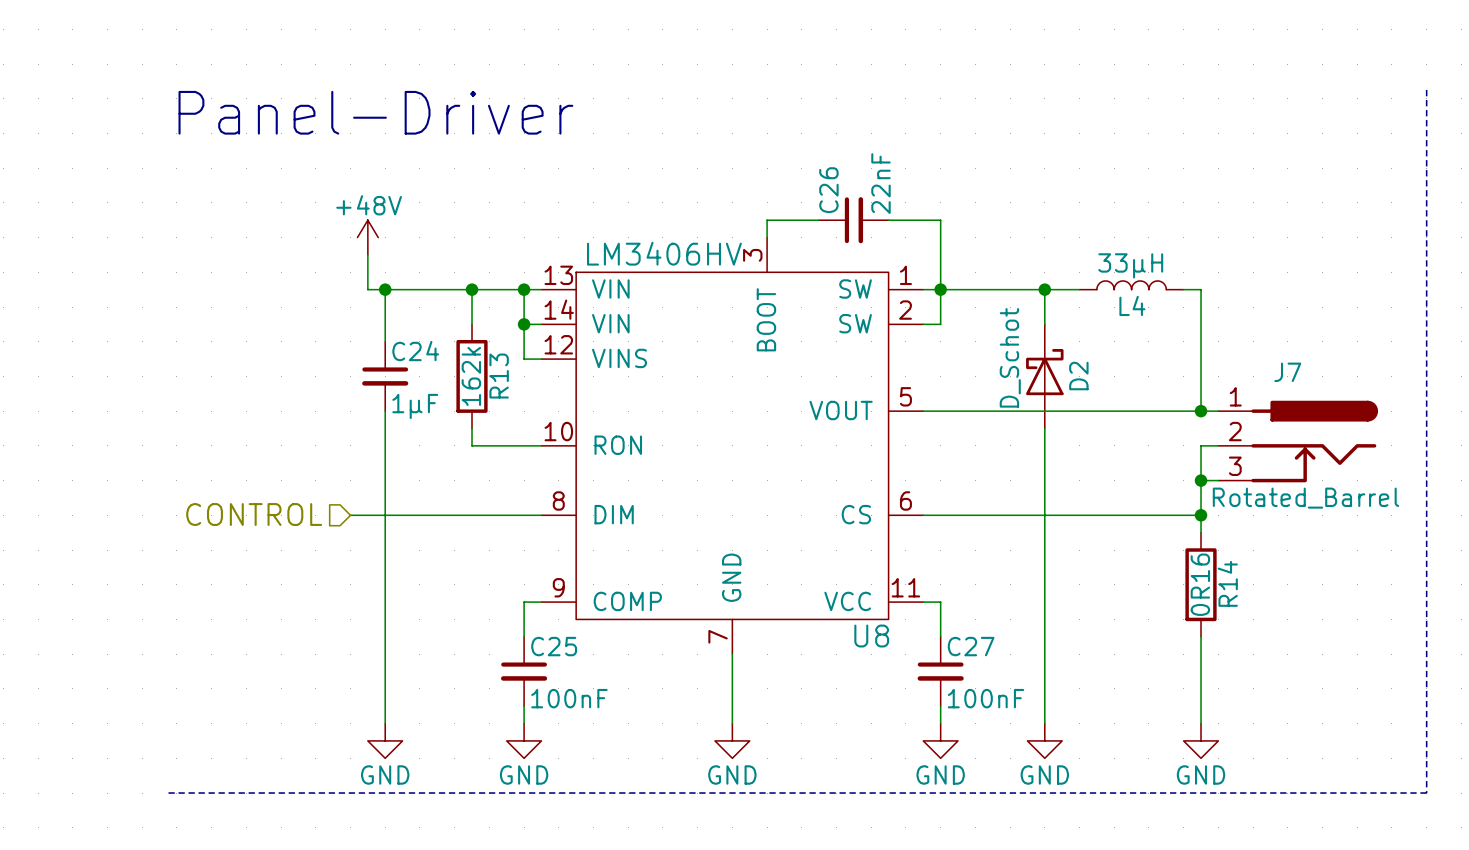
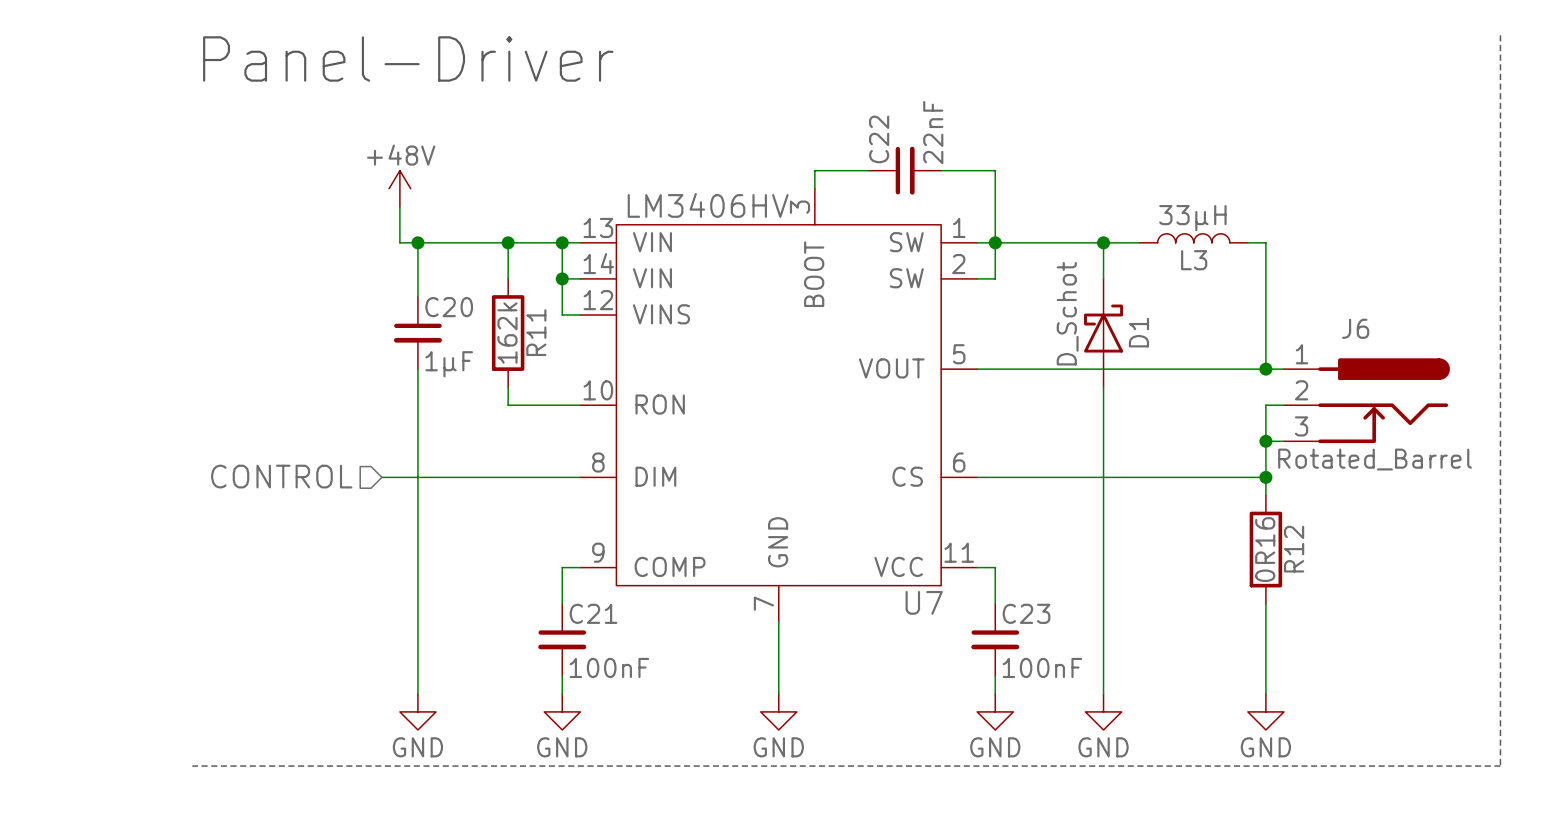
C26 name: C26 (828, 190) -> C22 (879, 139)
L4 name: L4 (1132, 305) -> L3 (1194, 260)
C24 name: C24 (415, 351) -> C20 (449, 307)
J7 name: J7 (1287, 372) -> J6 (1355, 328)
R13 name: R13 (499, 376) -> R11 (536, 332)
D2 name: D2 (1078, 376) -> D1 (1138, 332)
R14 name: R14 (1227, 583) -> R12 (1294, 549)
U8 name: U8 (871, 636) -> U7 (924, 602)
C25 name: C25 (554, 646) -> C21 (593, 613)
C27 name: C27 (971, 646) -> C23 (1026, 613)

